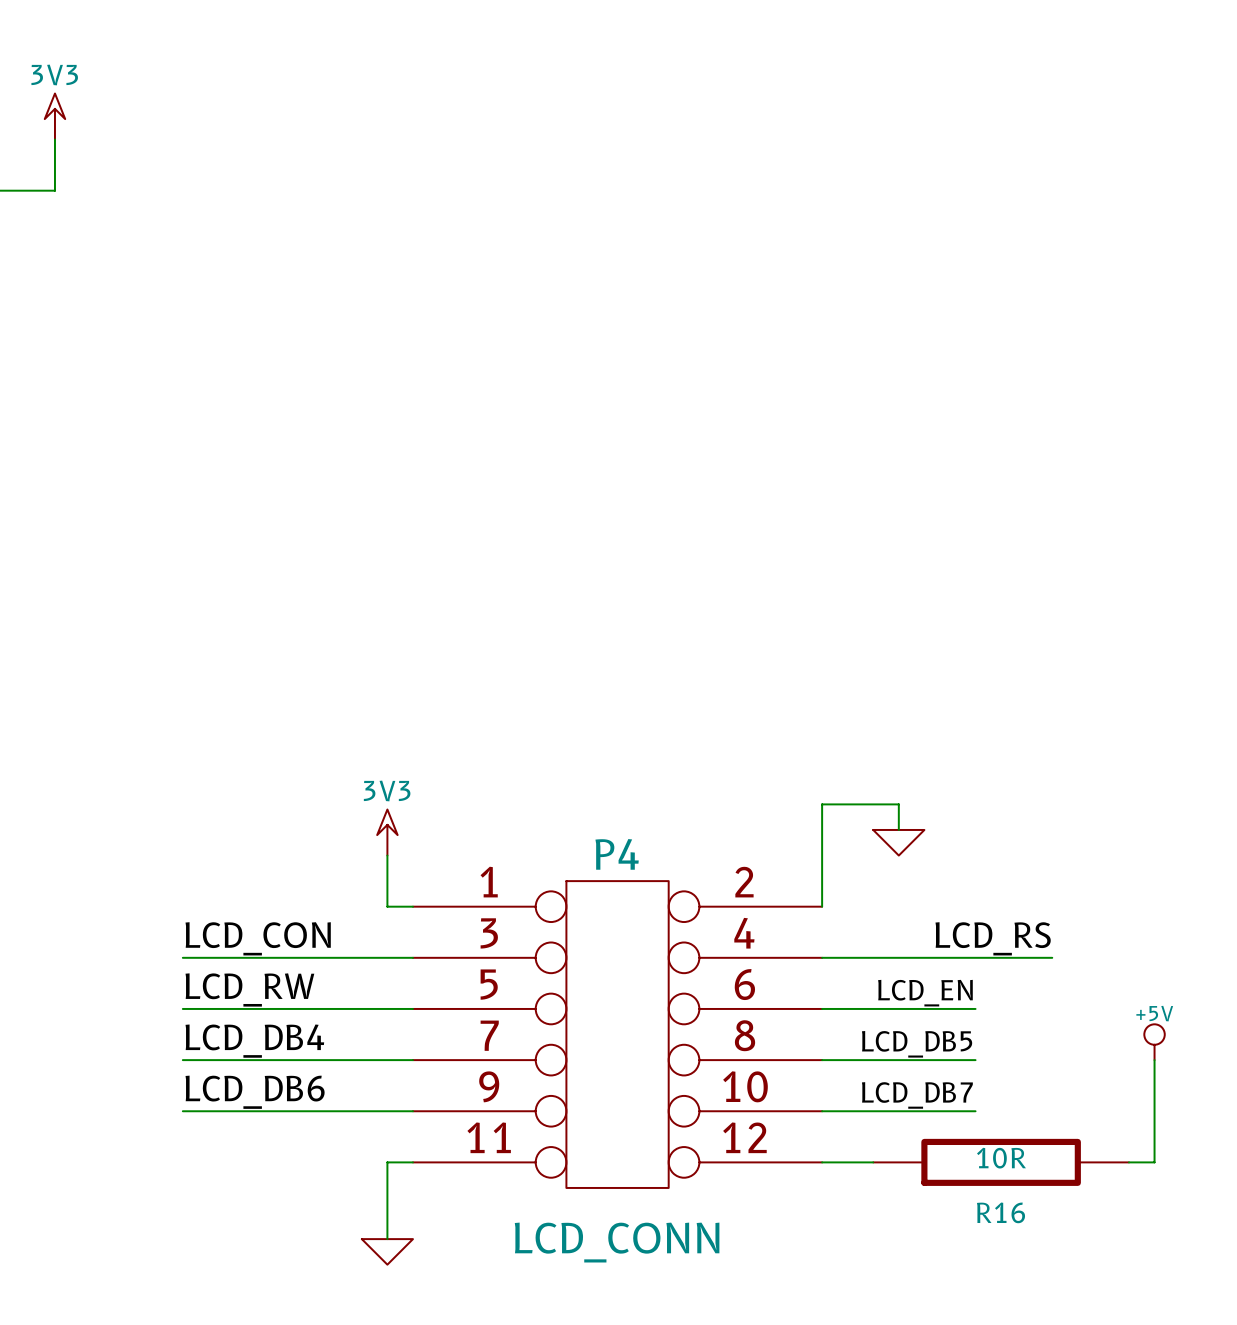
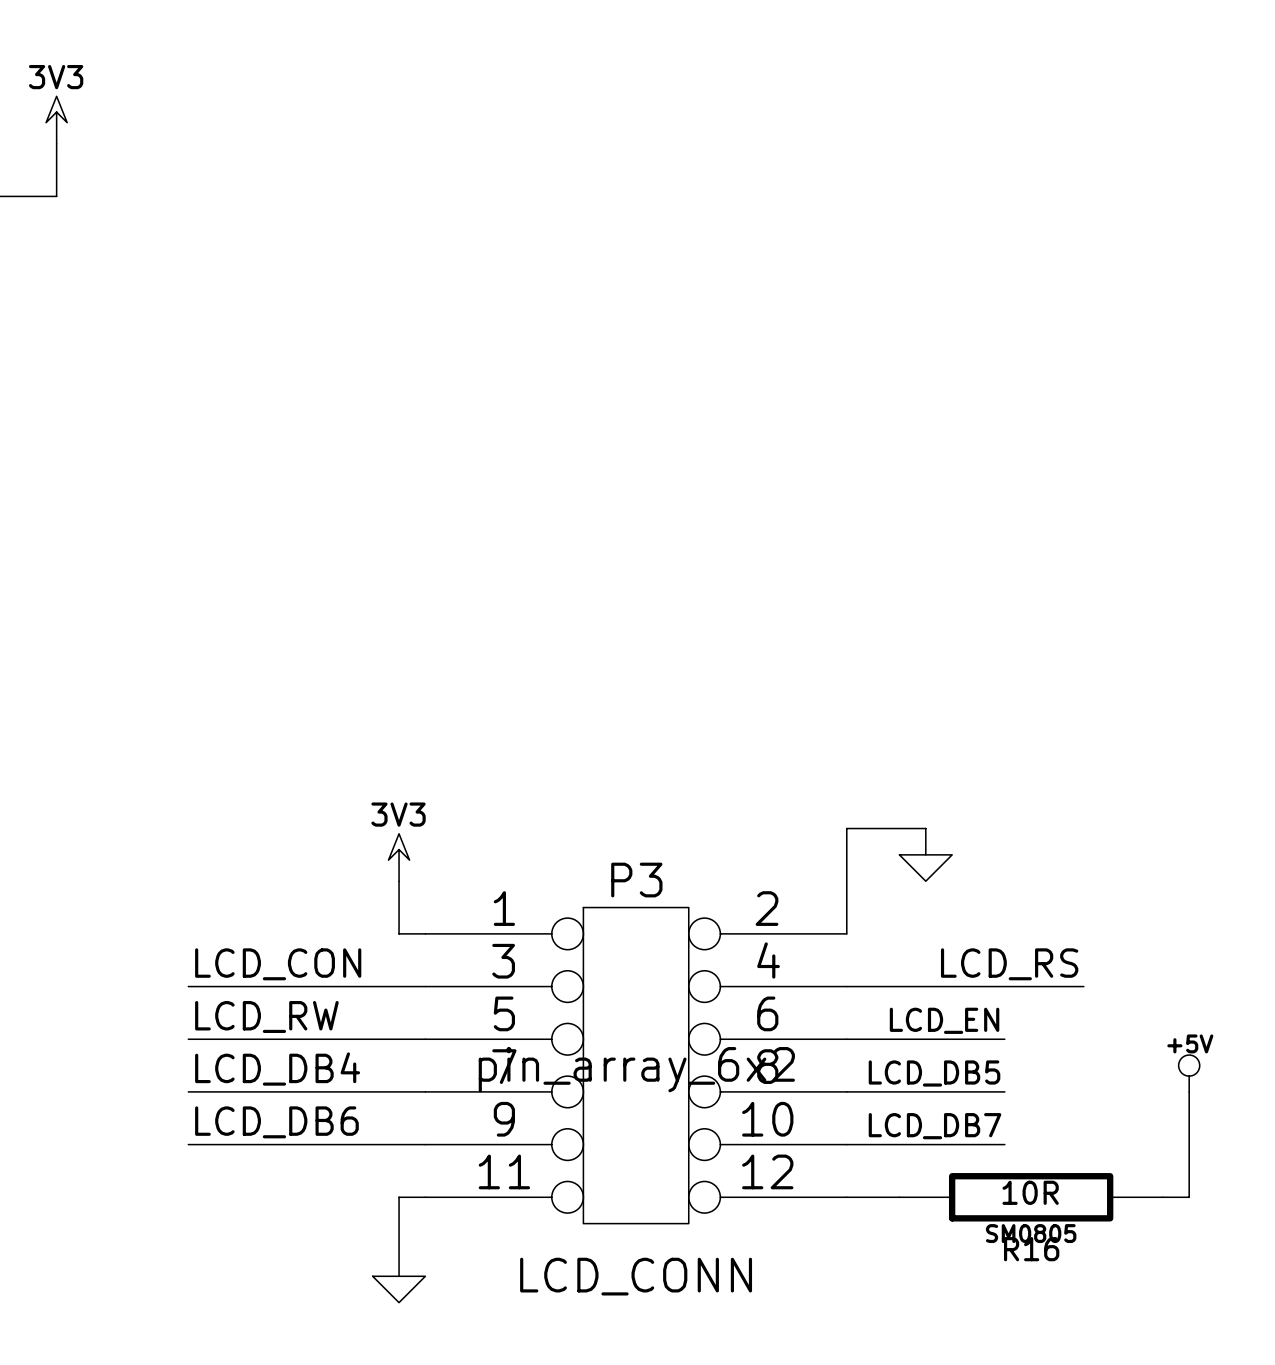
P4 name: P4 (617, 854) -> P3 (636, 880)
P4 text: none -> pin_array_6x2 (636, 1069)
R16 text: none -> SM0805 (1031, 1233)

